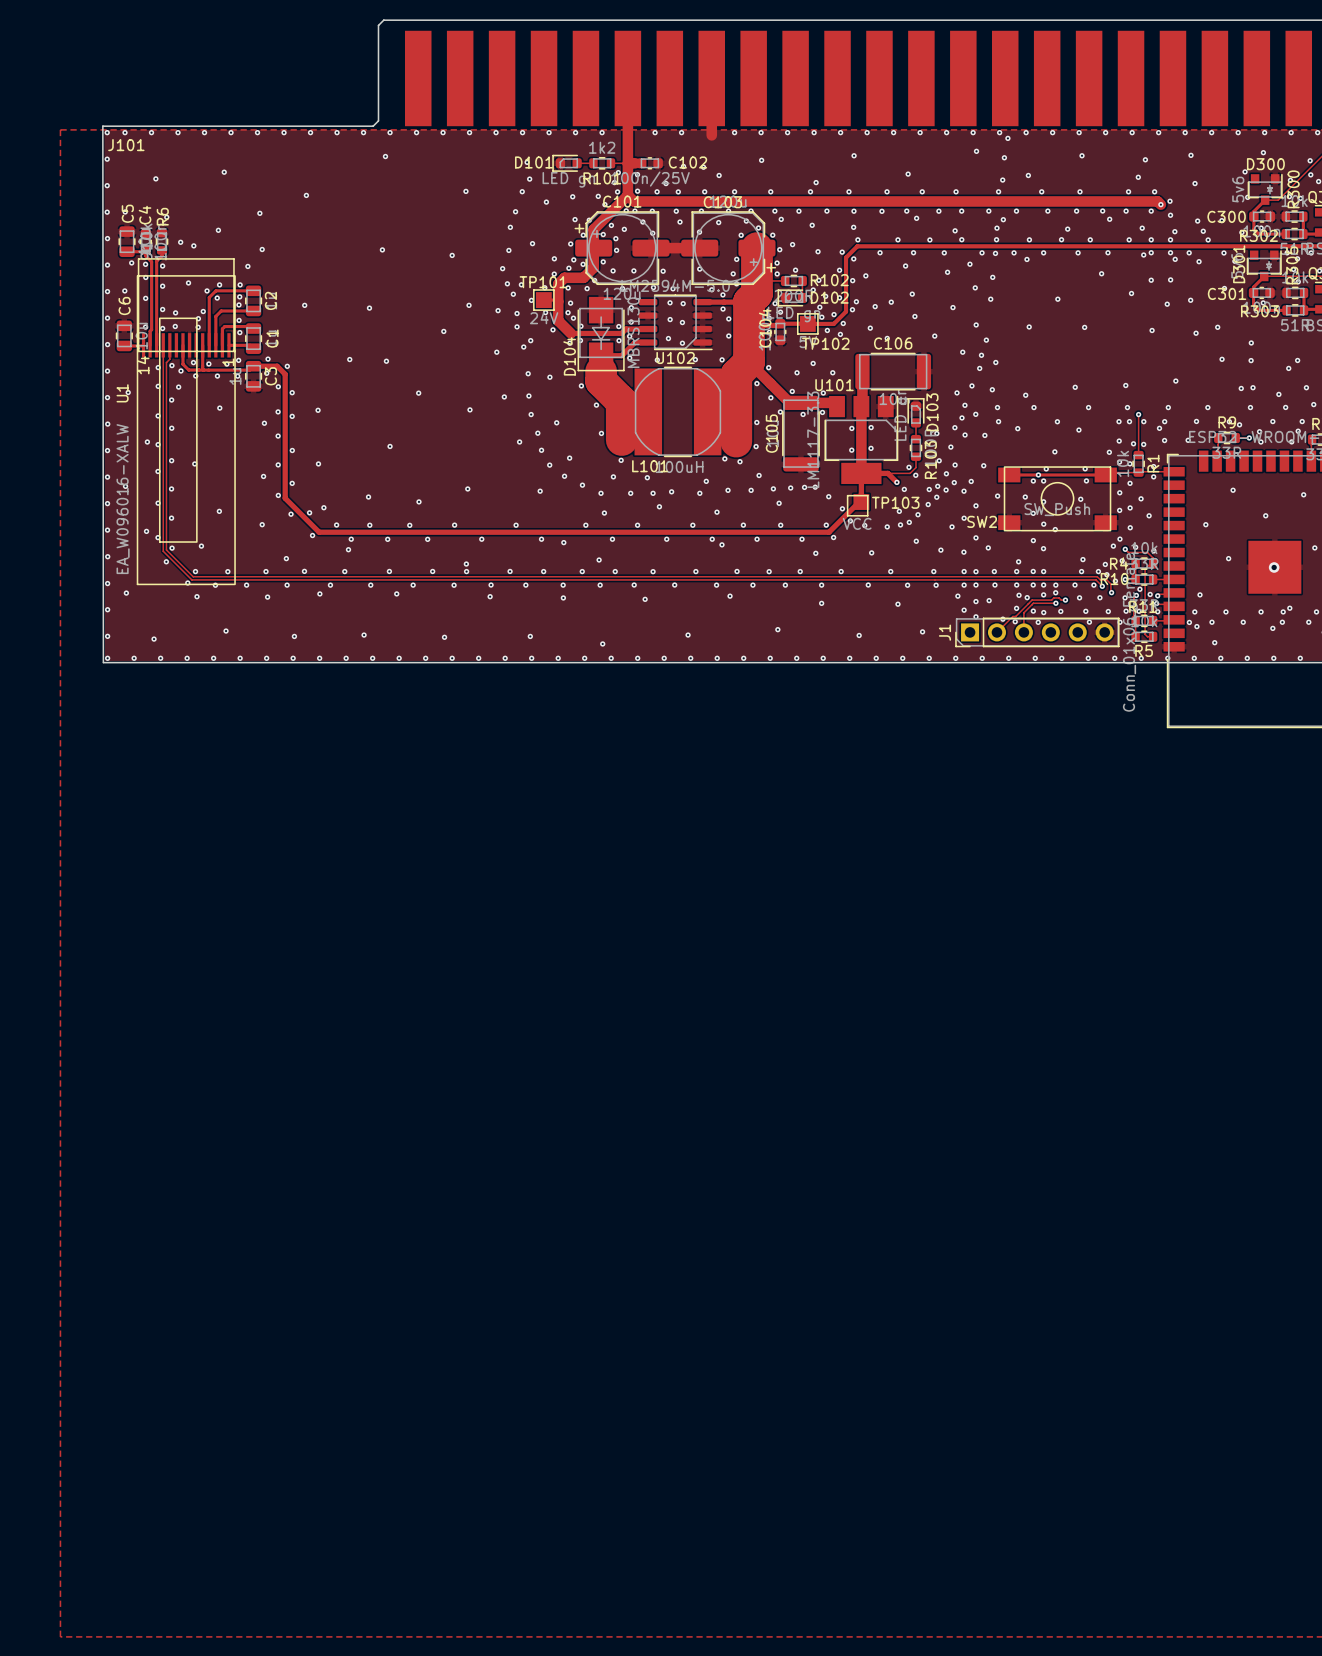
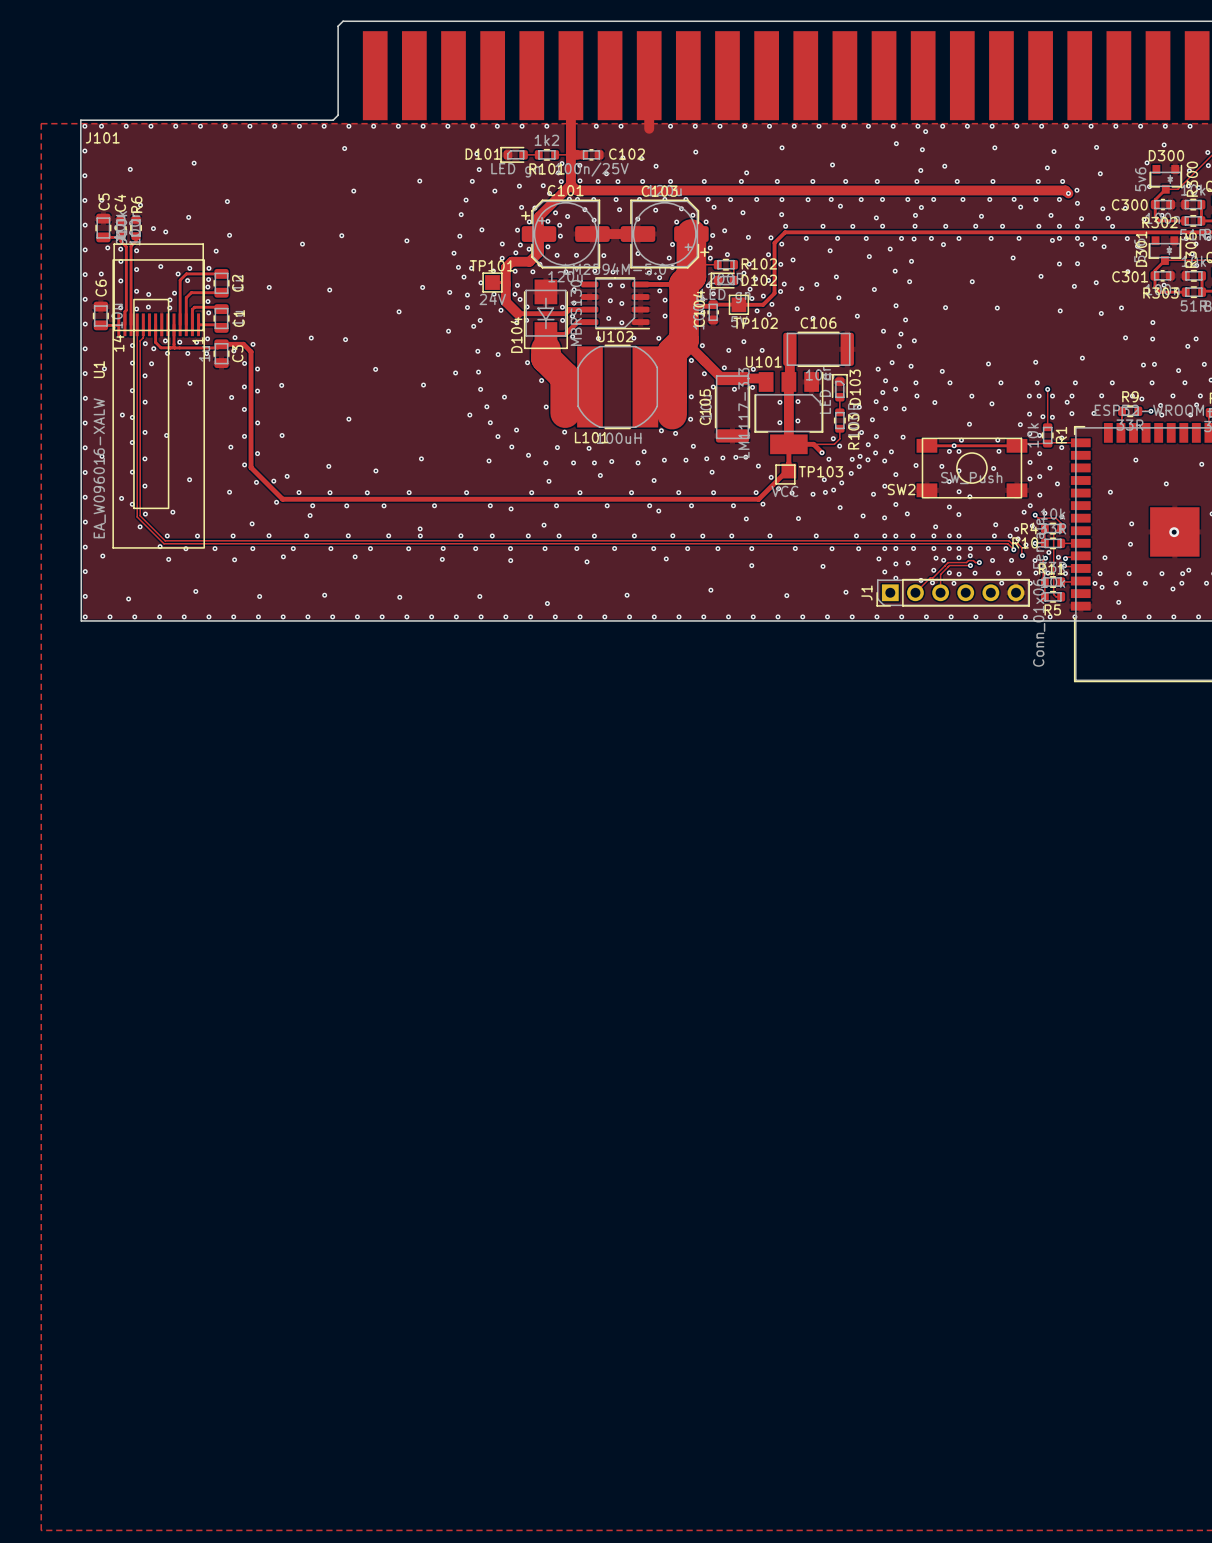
via: (306, 195) -> none
via: none -> (353, 191)
via: none -> (302, 244)
via: none -> (1130, 544)

